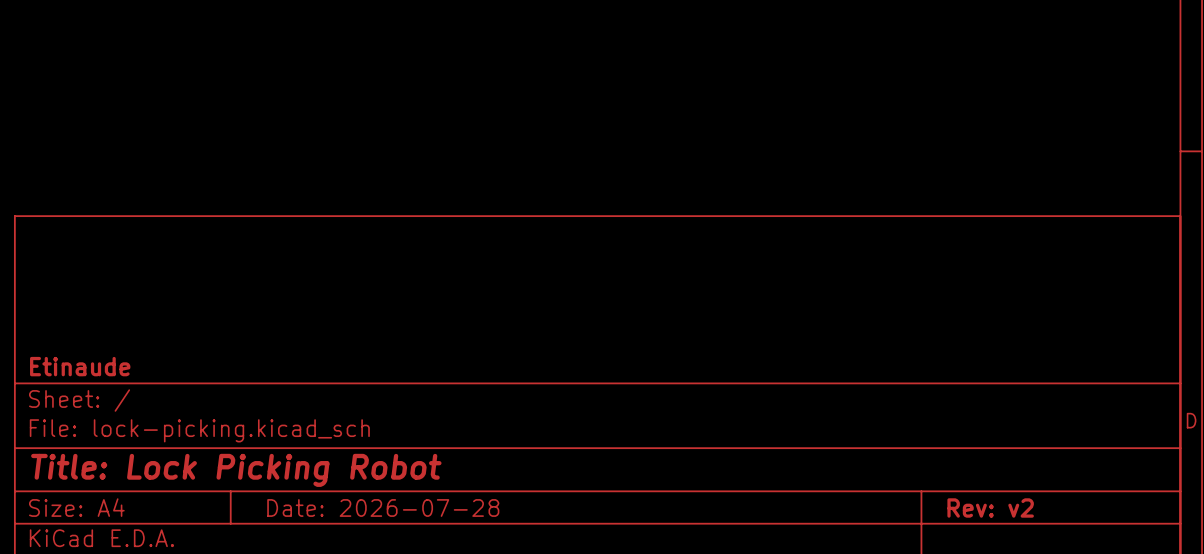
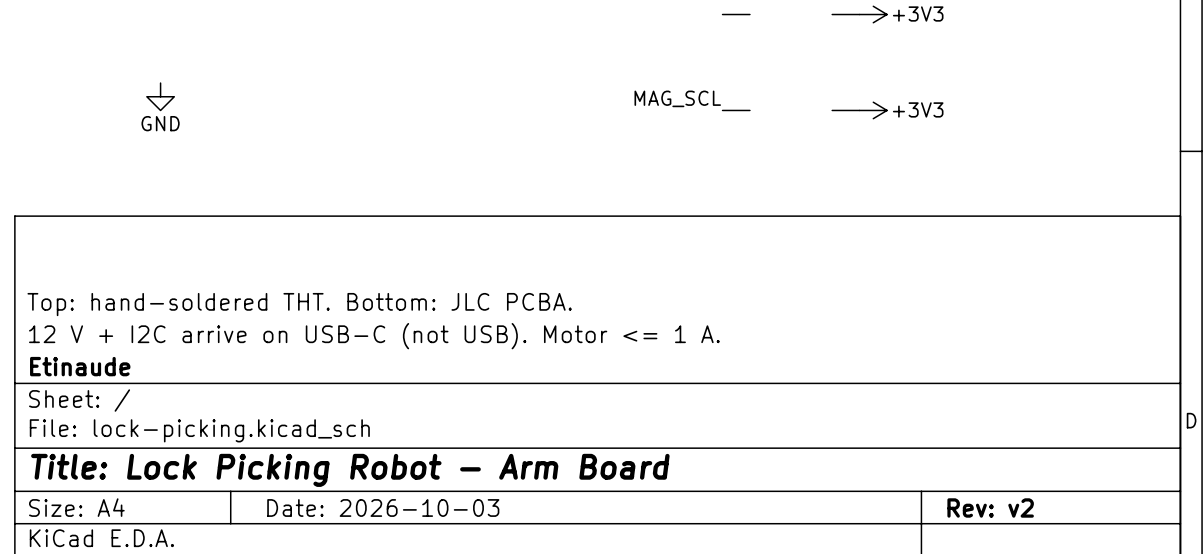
wire: none -> (722, 14) (749, 14)
wire: none -> (832, 14) (859, 14)
power symbol: none -> +3V3 (873, 14)
power symbol: none -> GND (160, 96)
label: none -> MAG_SCL (677, 98)
wire: none -> (722, 110) (749, 110)
wire: none -> (832, 110) (859, 110)
power symbol: none -> +3V3 (873, 110)
title block: none -> Top: hand-soldered THT. Bottom: JLC PCBA. (299, 304)
title block: none -> 12 V + I2C arrive on USB-C (not USB). Motor <= 1 A. (374, 336)
title block: Title: Lock Picking Robot (236, 470) -> Title: Lock Picking Robot - Arm Board (350, 470)
title block: Date: 2026-07-28 (383, 507) -> Date: 2026-10-03 (383, 507)

